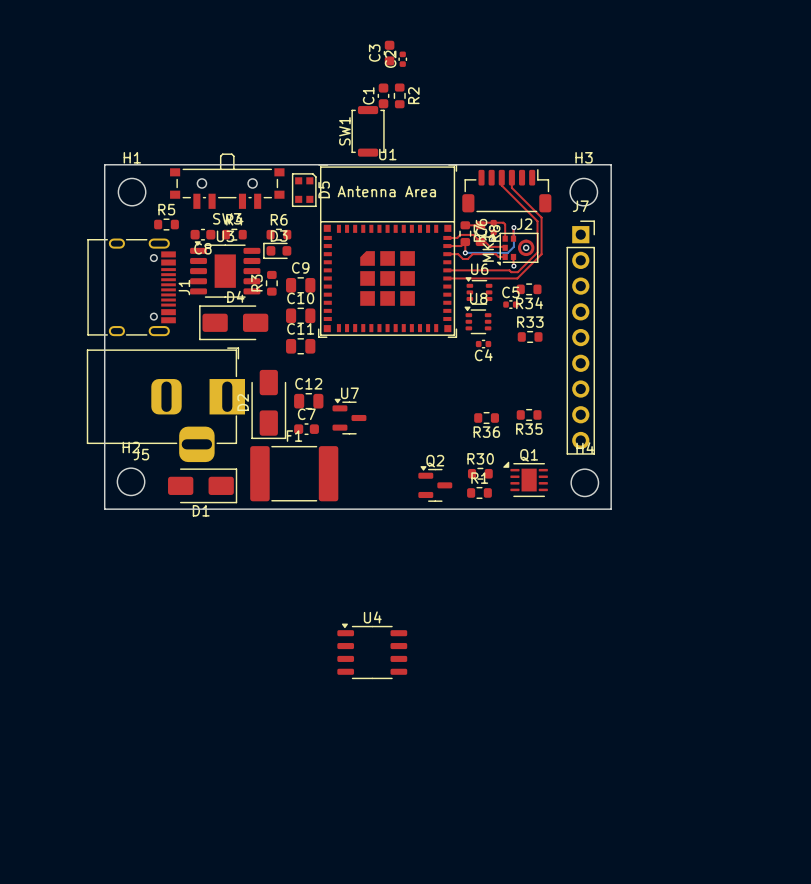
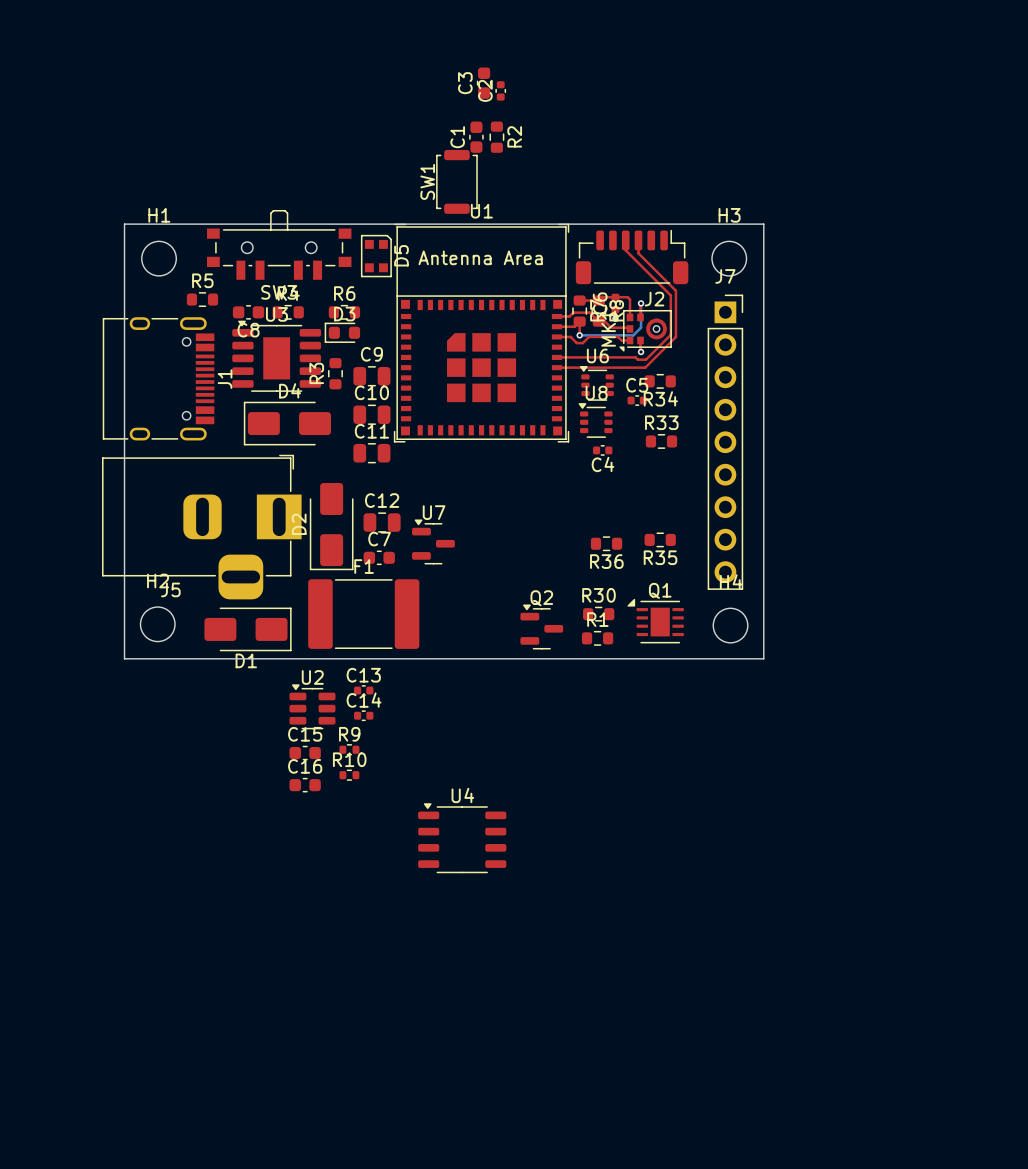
C13: none -> (363, 690)
U2: none -> (312, 706)
C14: none -> (363, 715)
R9: none -> (349, 749)
C15: none -> (305, 753)
R10: none -> (349, 775)
C16: none -> (305, 785)

